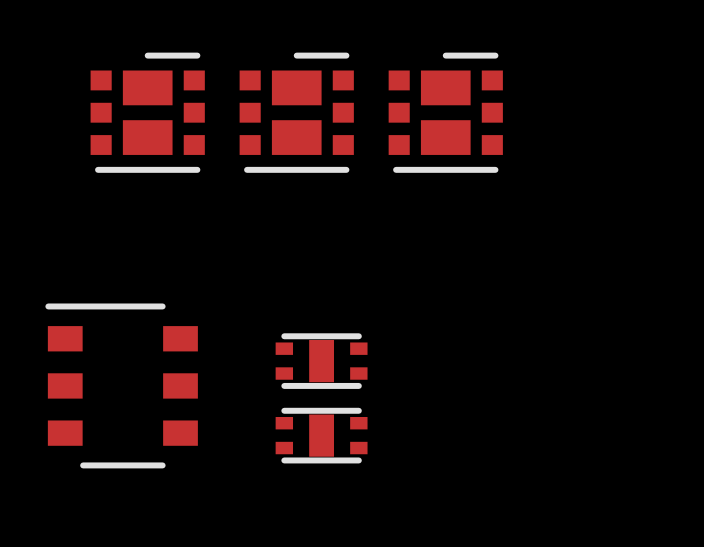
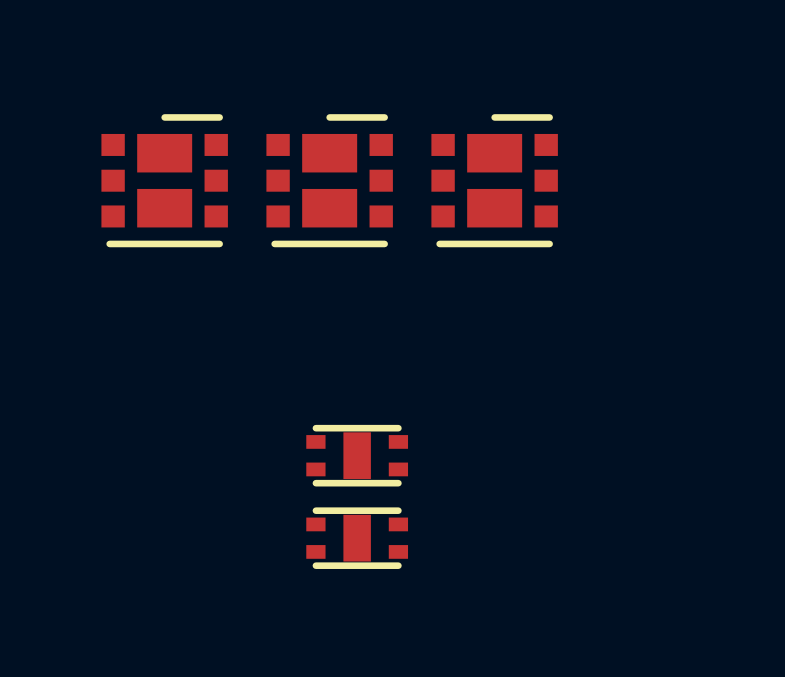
part: (121, 385) -> none

